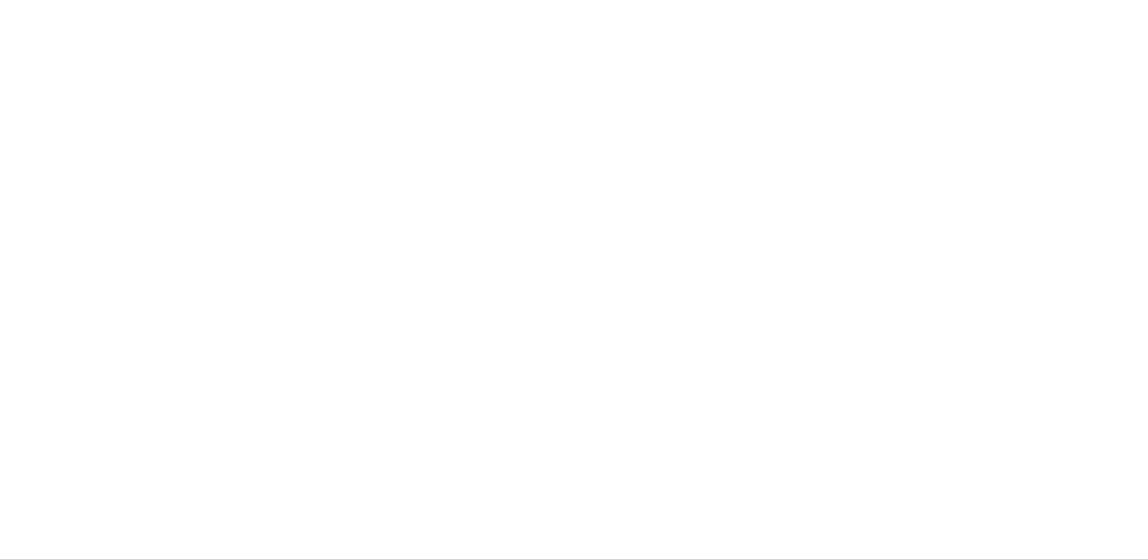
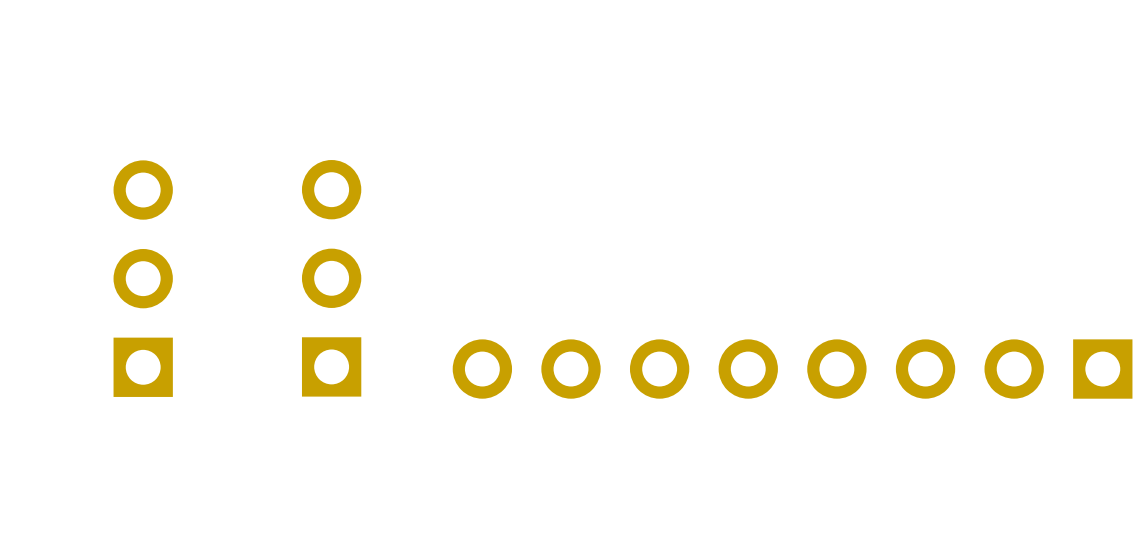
part: none -> (143, 278)
part: none -> (331, 278)
part: none -> (792, 369)

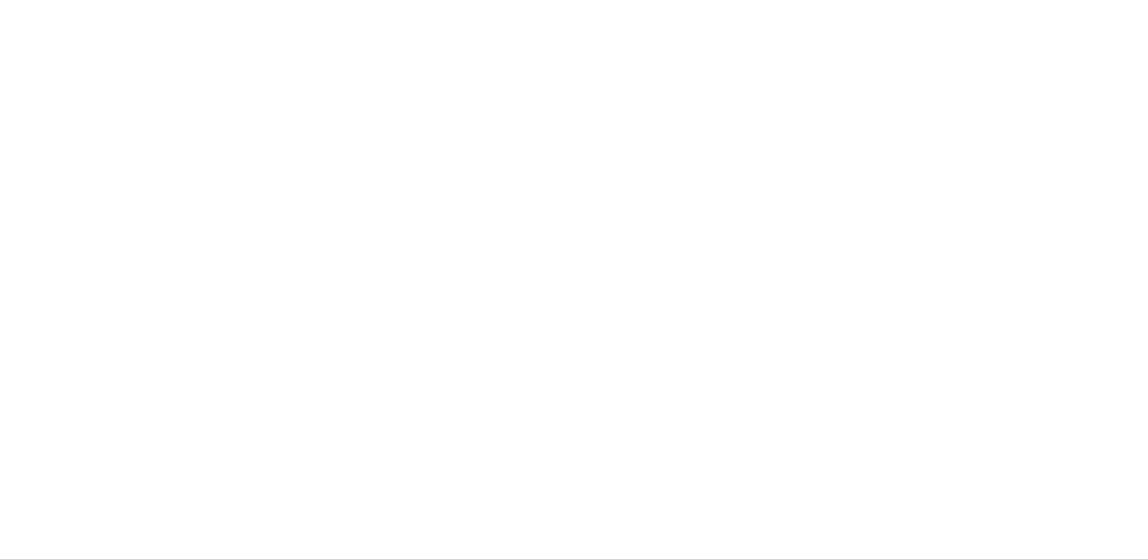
part: (143, 278) -> none
part: (331, 278) -> none
part: (792, 369) -> none

